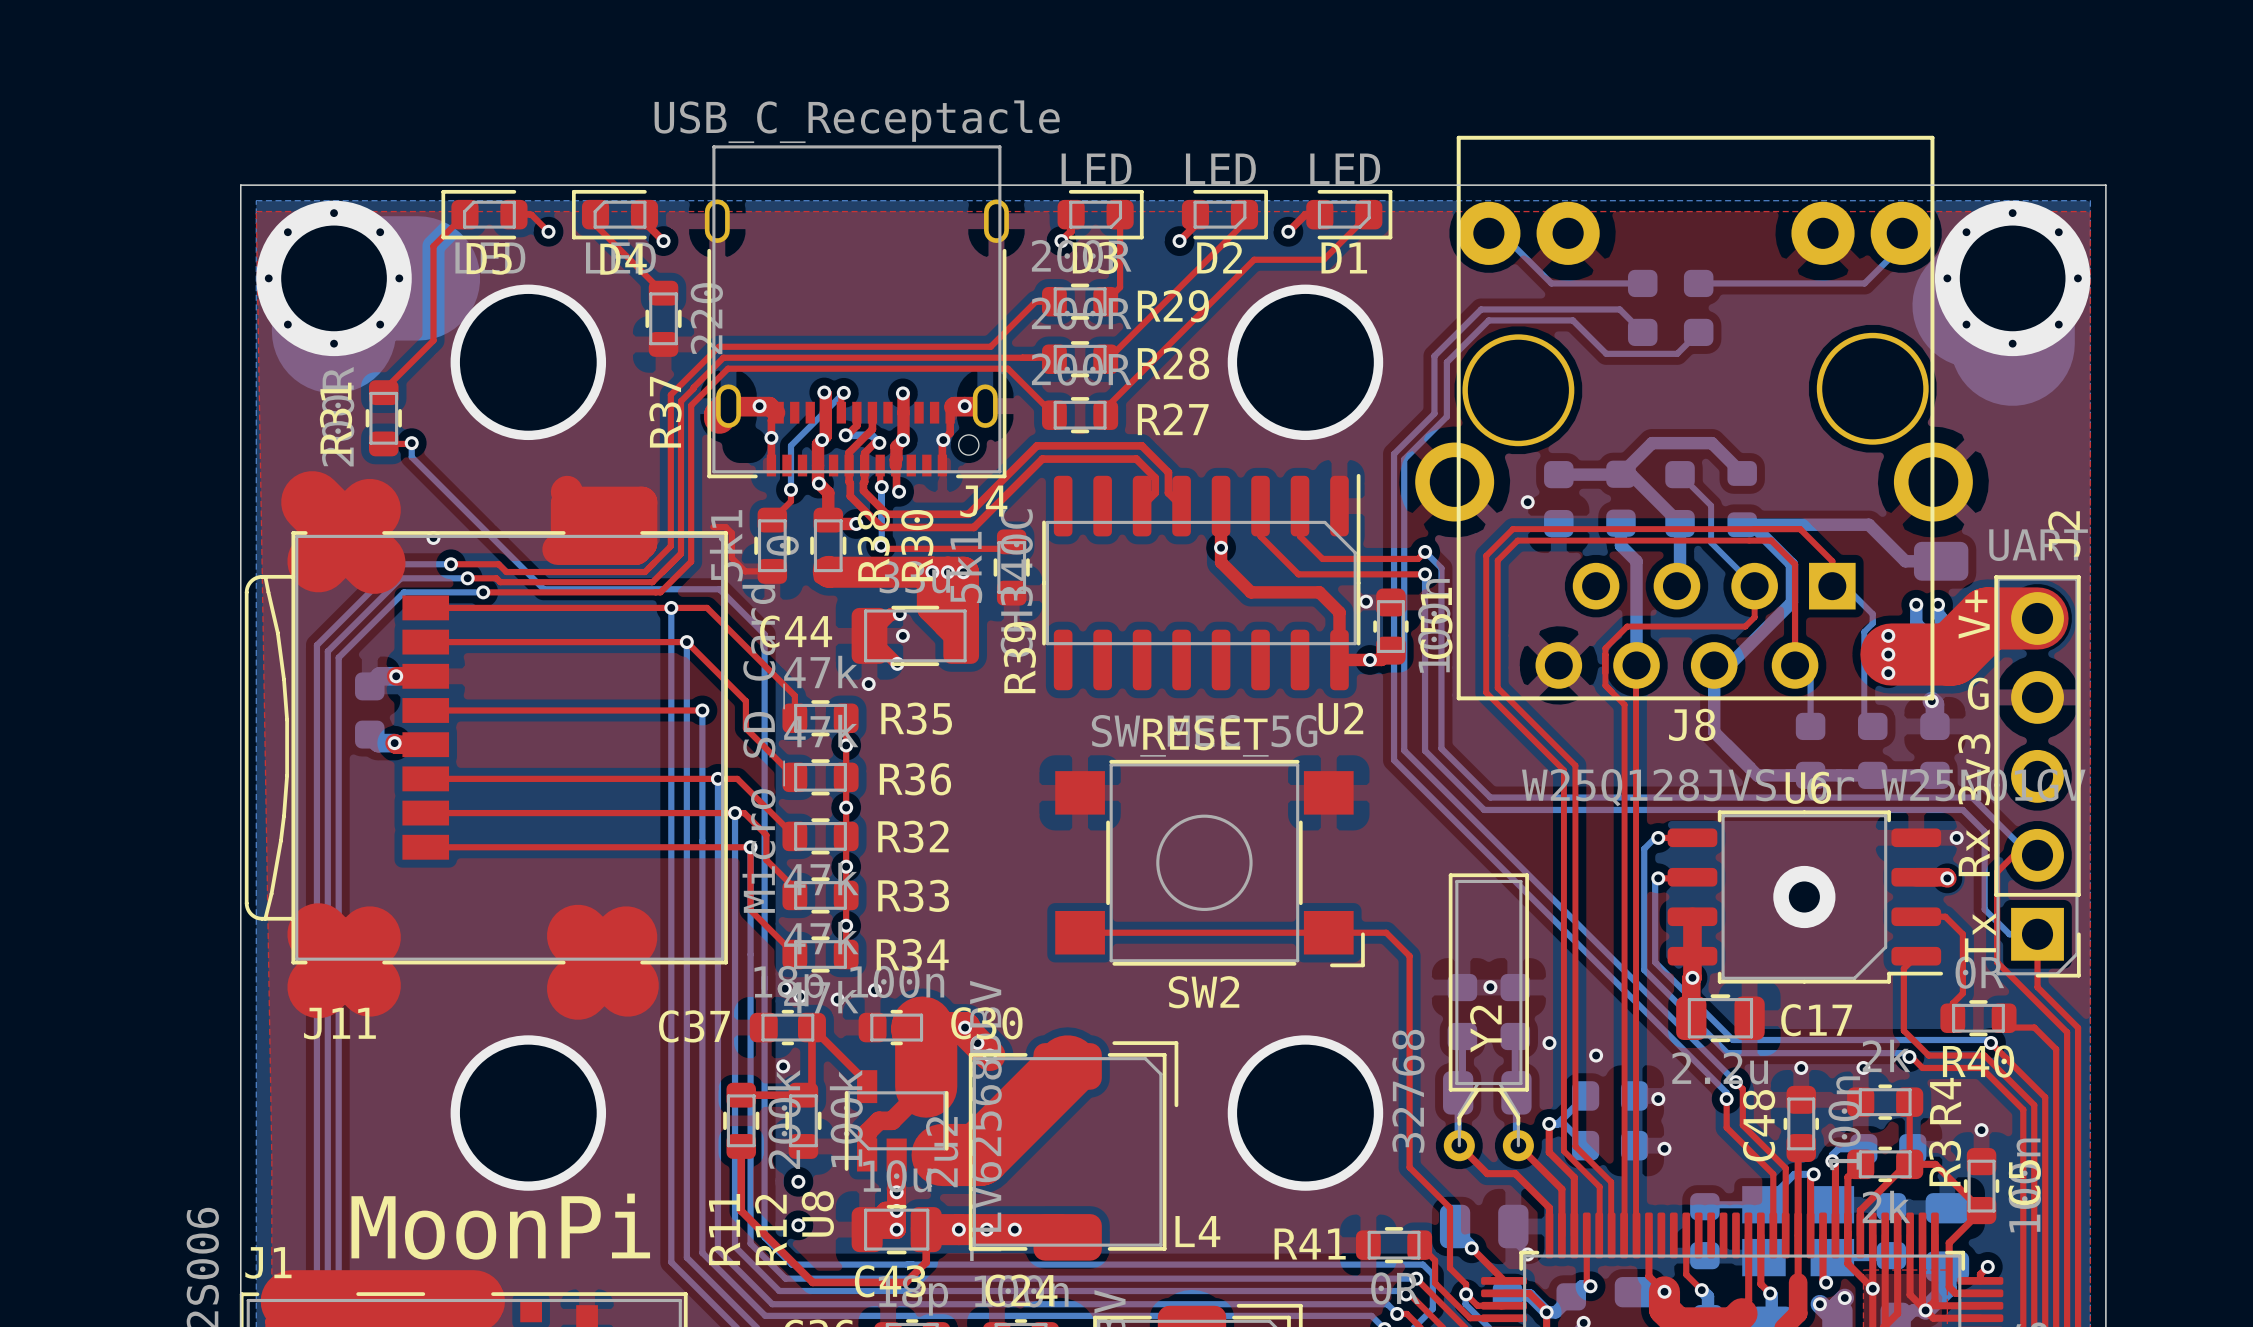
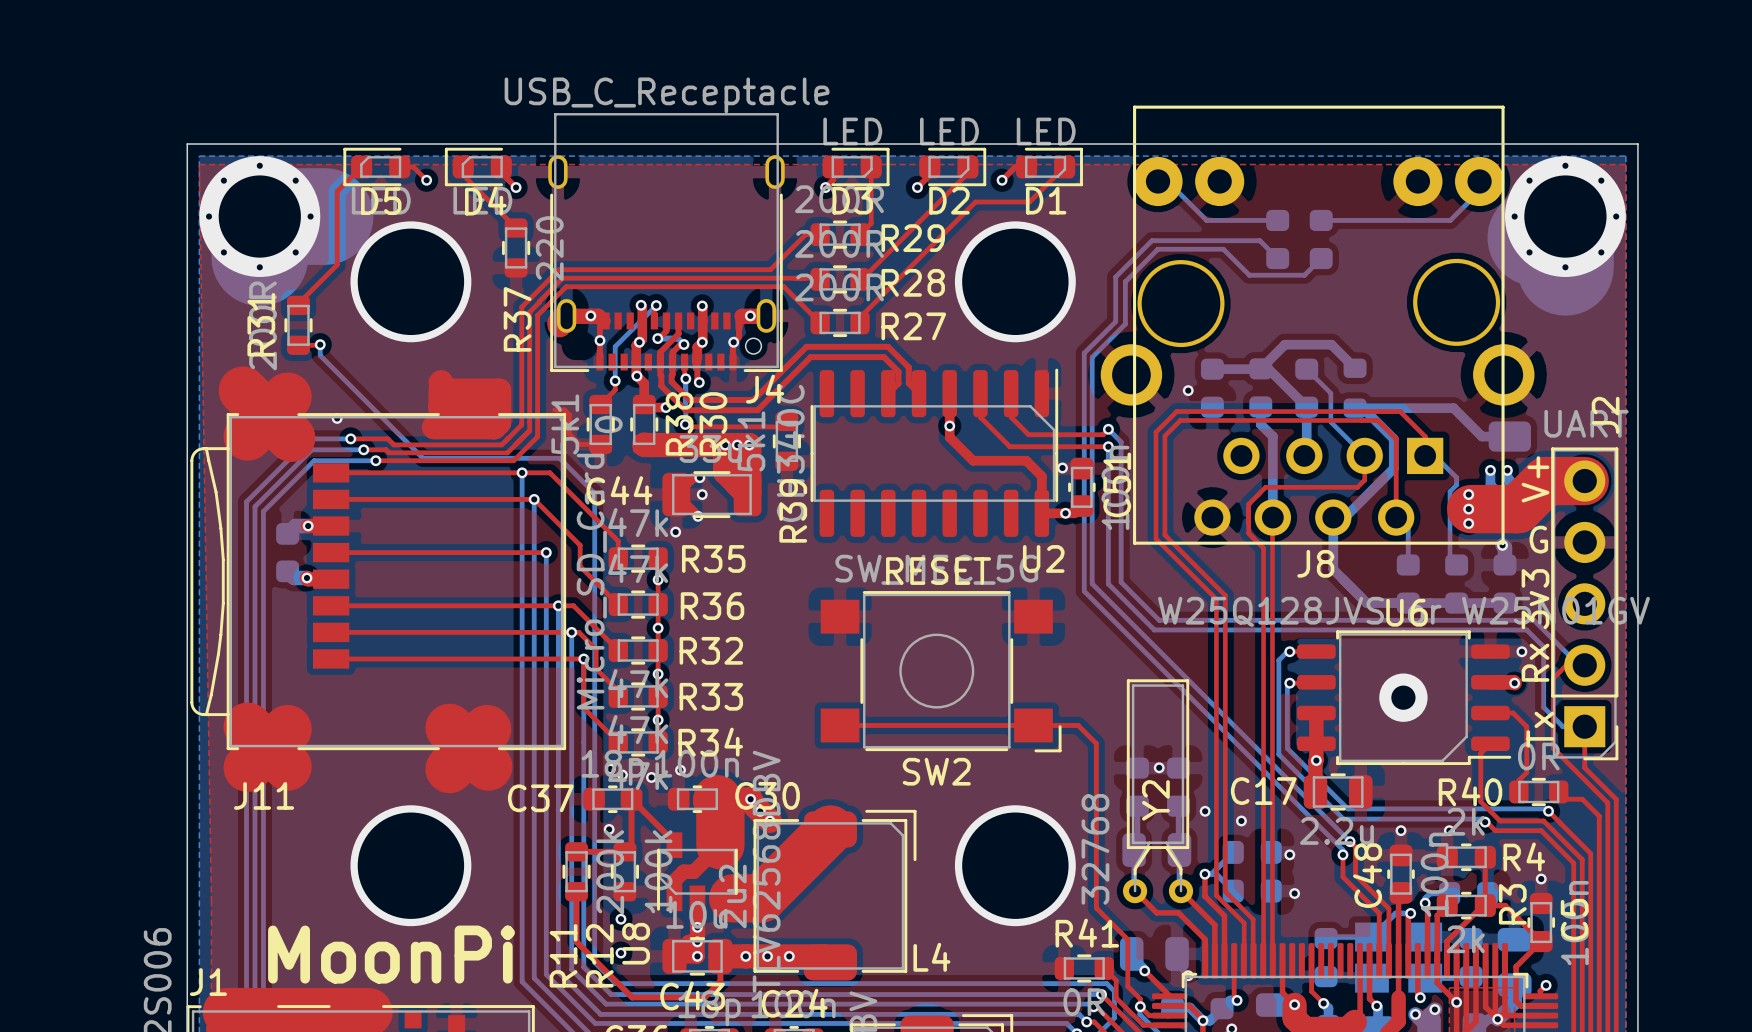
C17 name position: C17 (1816, 1020) -> C17 (1263, 791)
R40 name position: R40 (1978, 1061) -> R40 (1470, 791)
R4 name rotation: 0° (1945, 1101) -> 90° clockwise (1524, 856)
R41 name position: R41 (1310, 1243) -> R41 (1087, 933)

